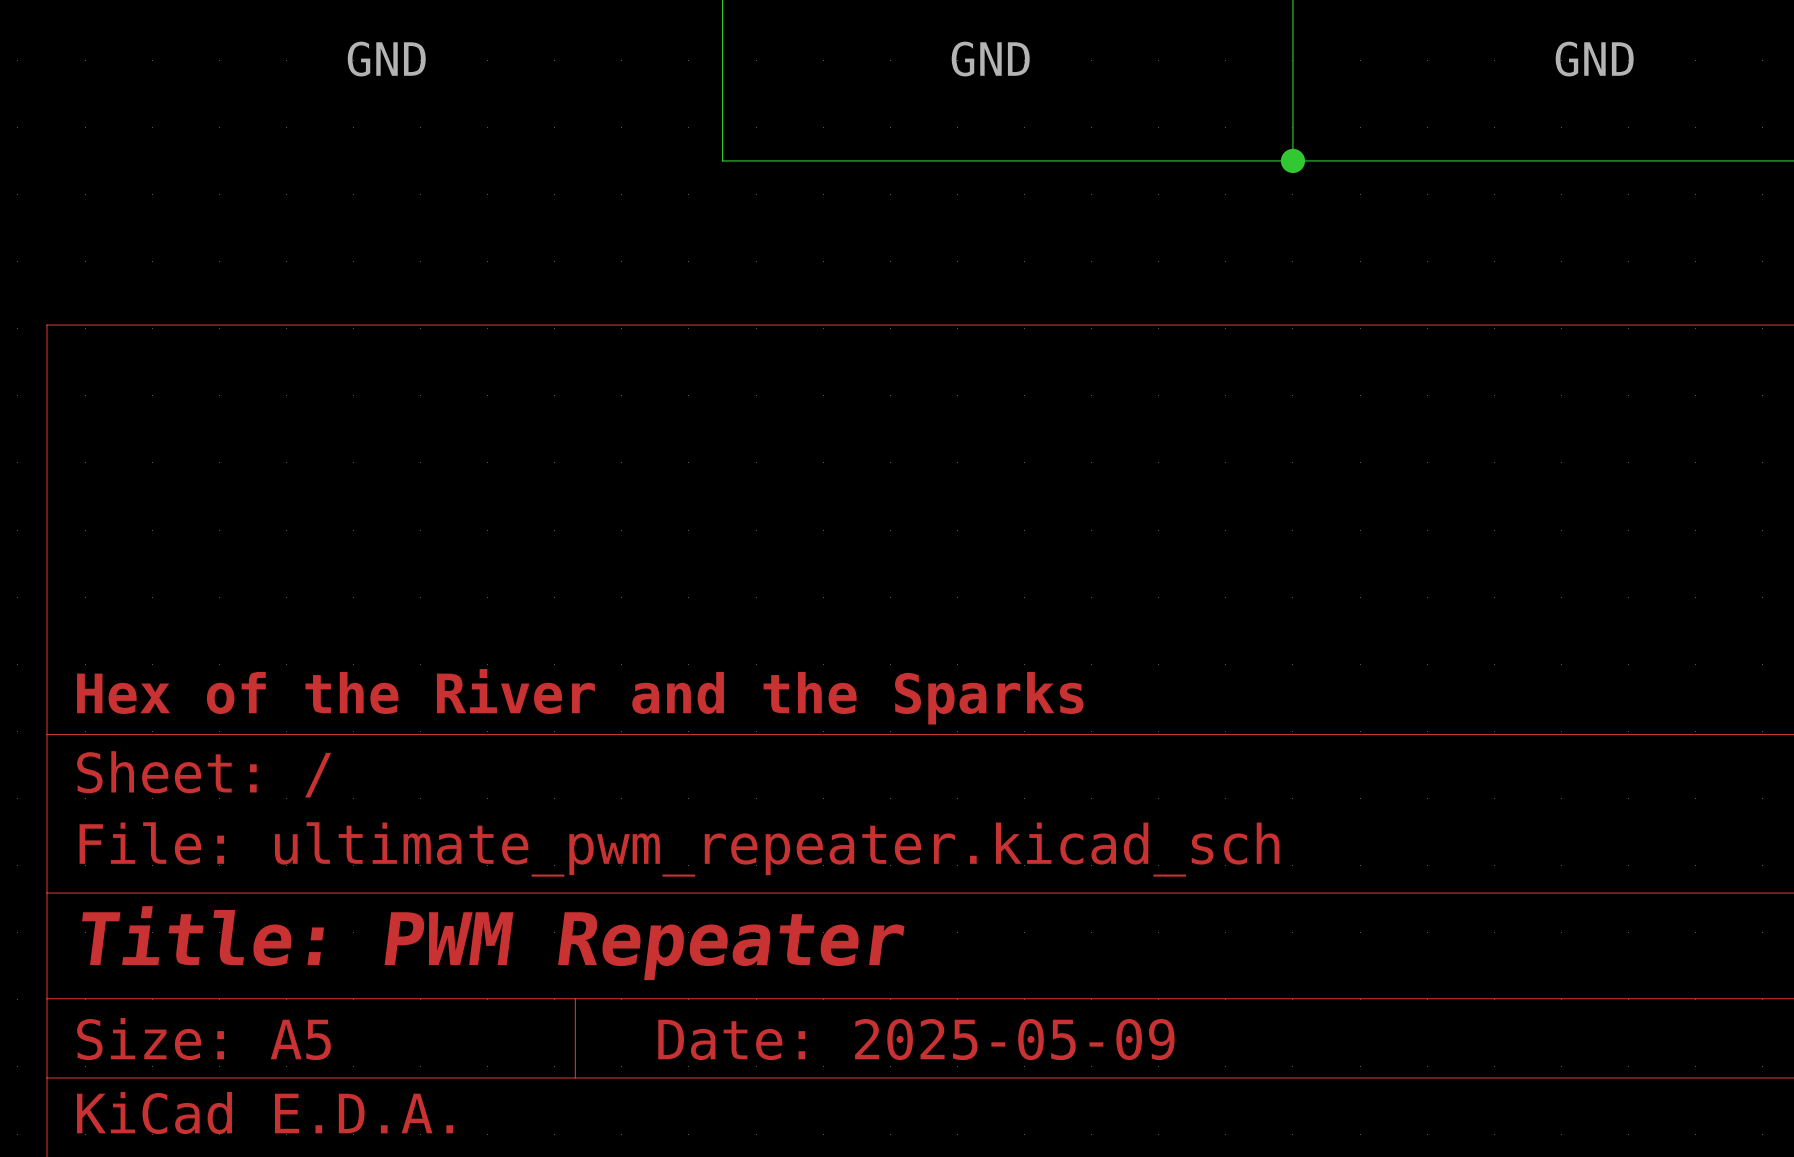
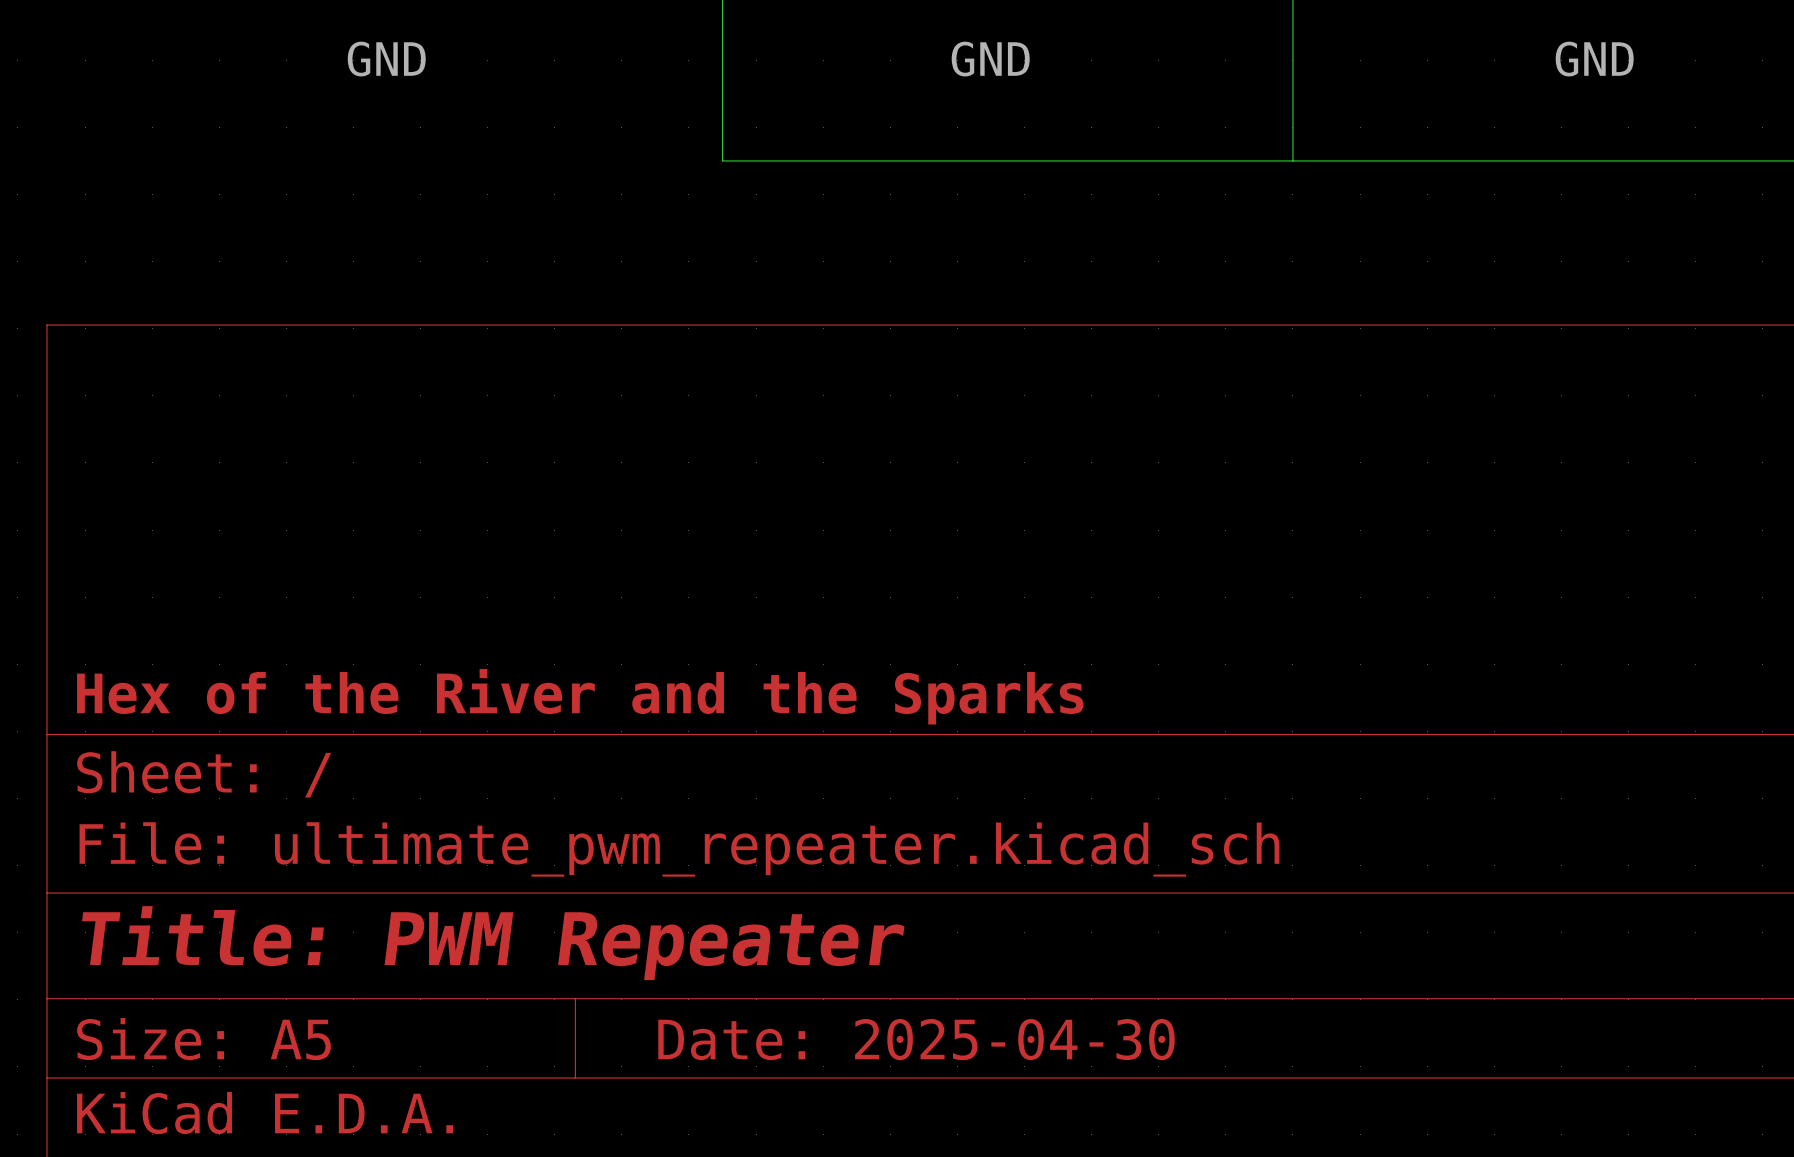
junction: (1292, 160) -> none
title block: Date: 2025-05-09 (916, 1039) -> Date: 2025-04-30 (916, 1039)

